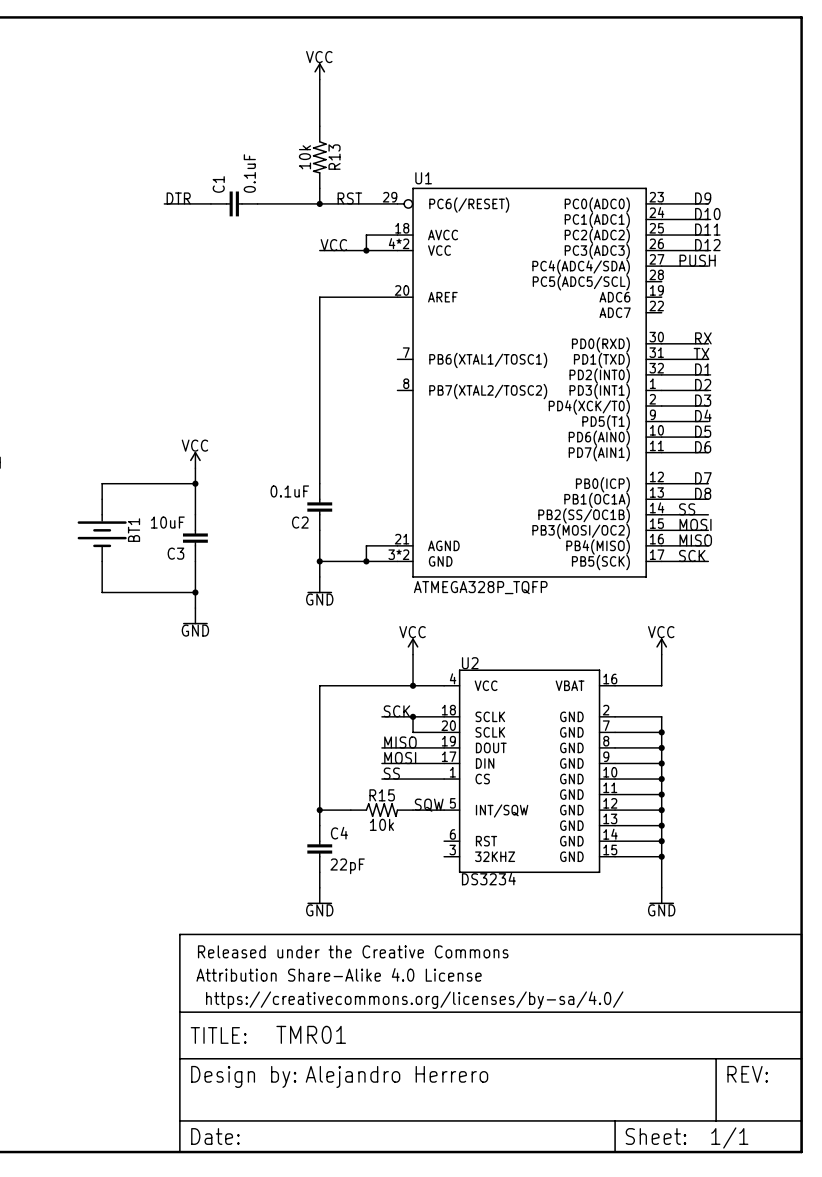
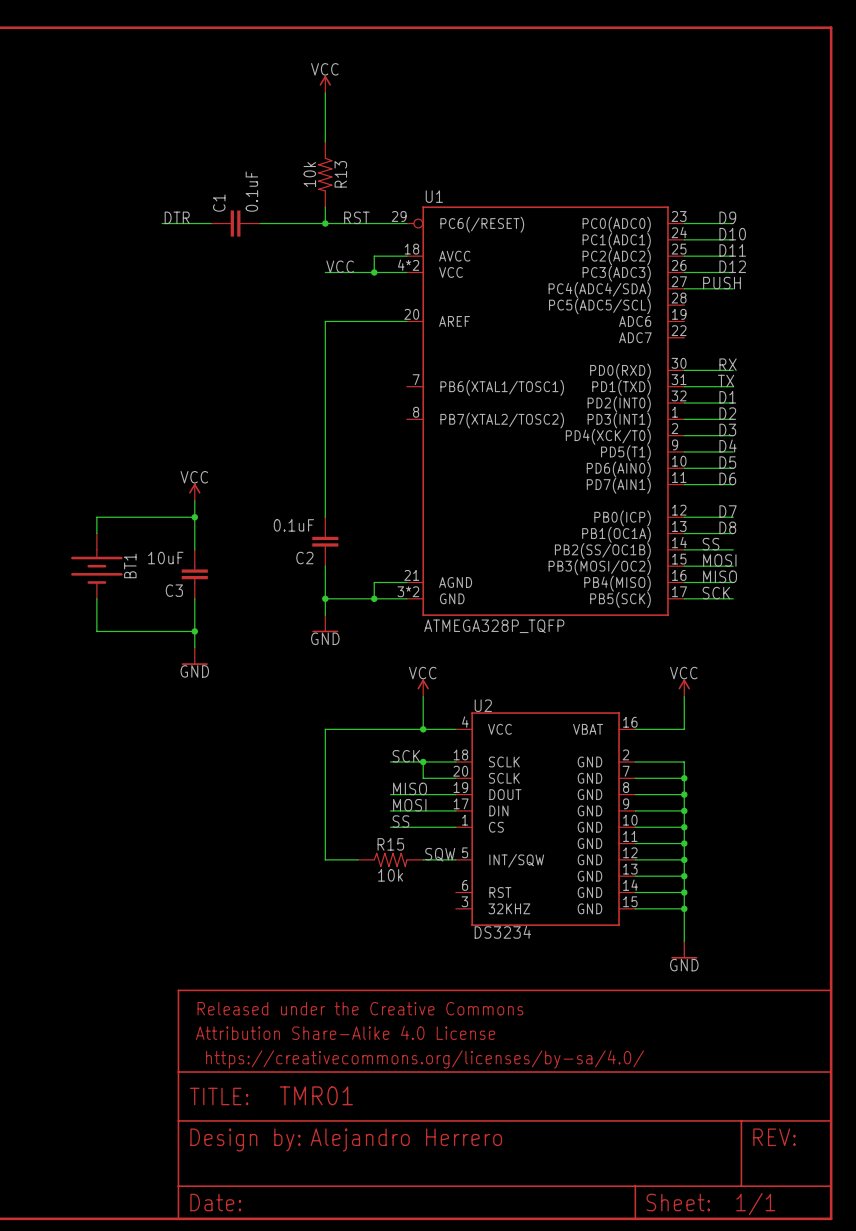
wire: (319, 810) (319, 825) -> none
junction: (319, 810) -> none
C4: 22pF (319, 848) -> none
wire: (319, 872) (319, 887) -> none
power symbol: GND (319, 895) -> none

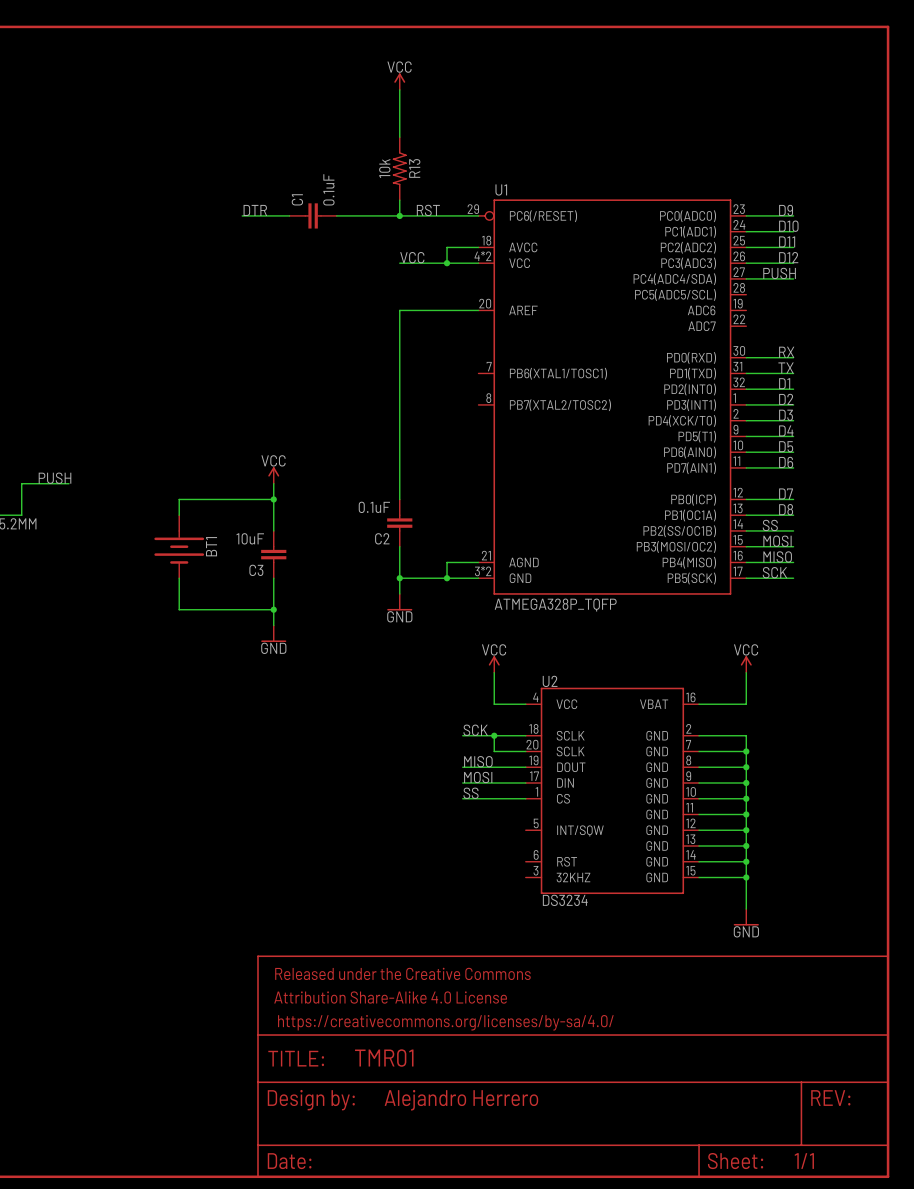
wire: (423, 729) (325, 729) (325, 859) (357, 859) -> none
junction: (423, 729) -> none
label: SQW (440, 854) -> none
R15: 10k (390, 859) -> none
wire: (423, 859) (455, 859) -> none

